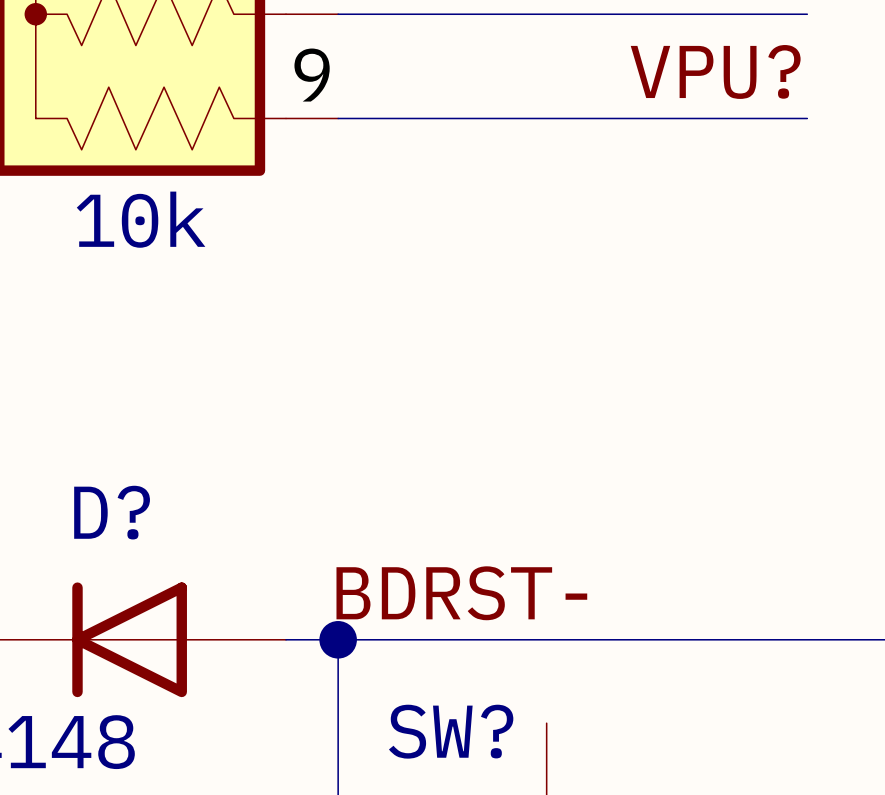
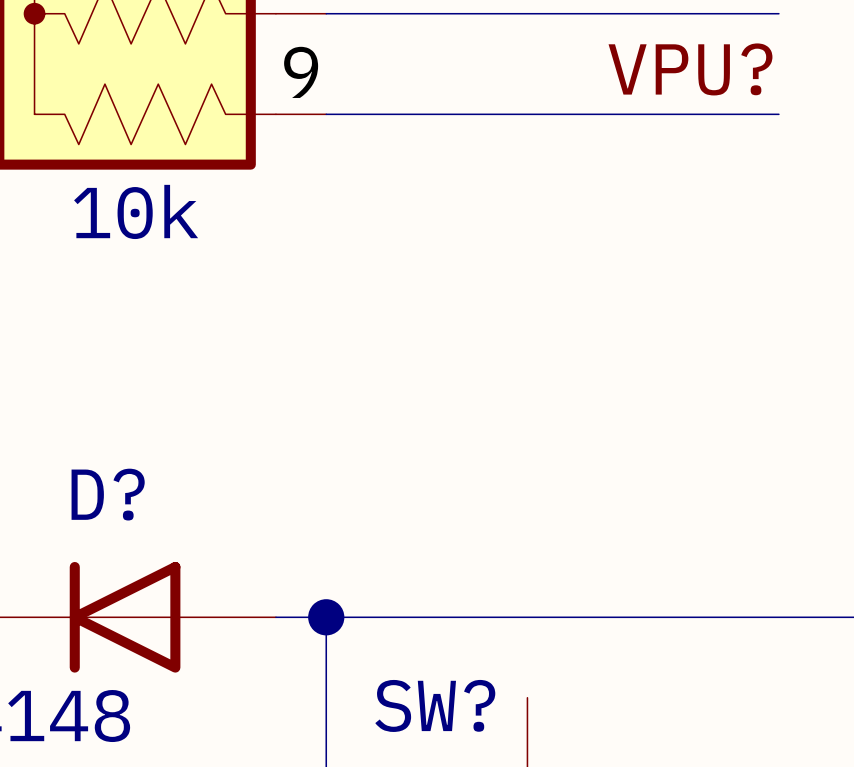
label: BDRST- (461, 593) -> none

